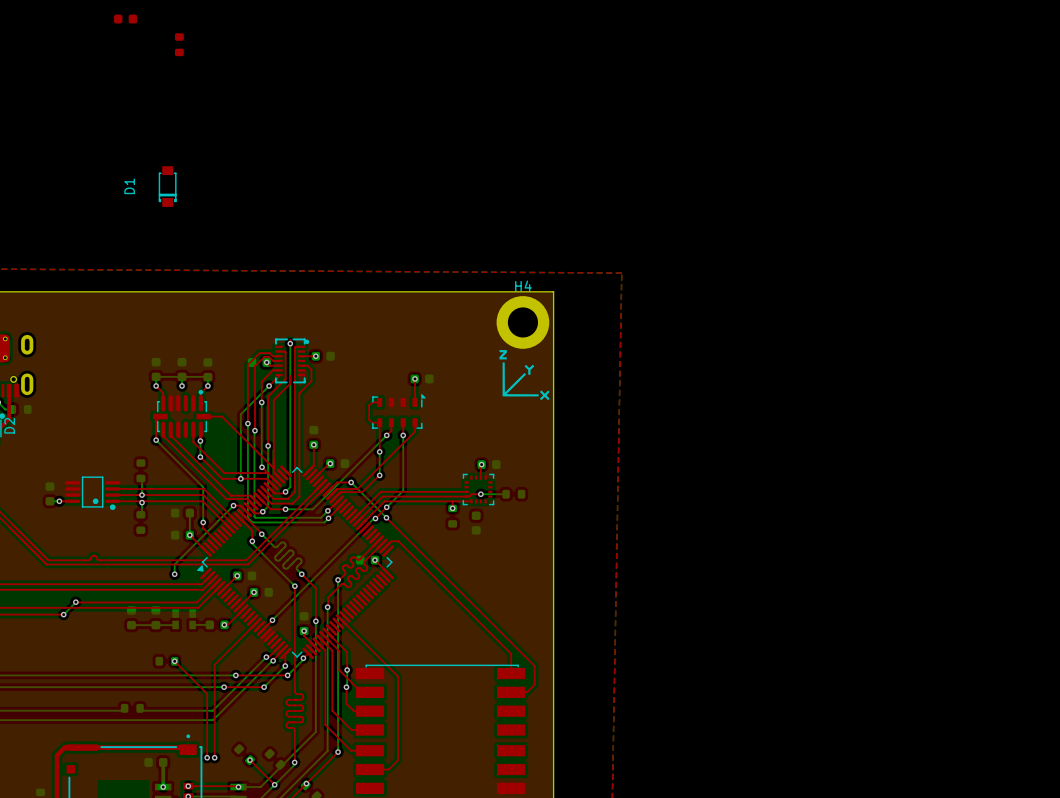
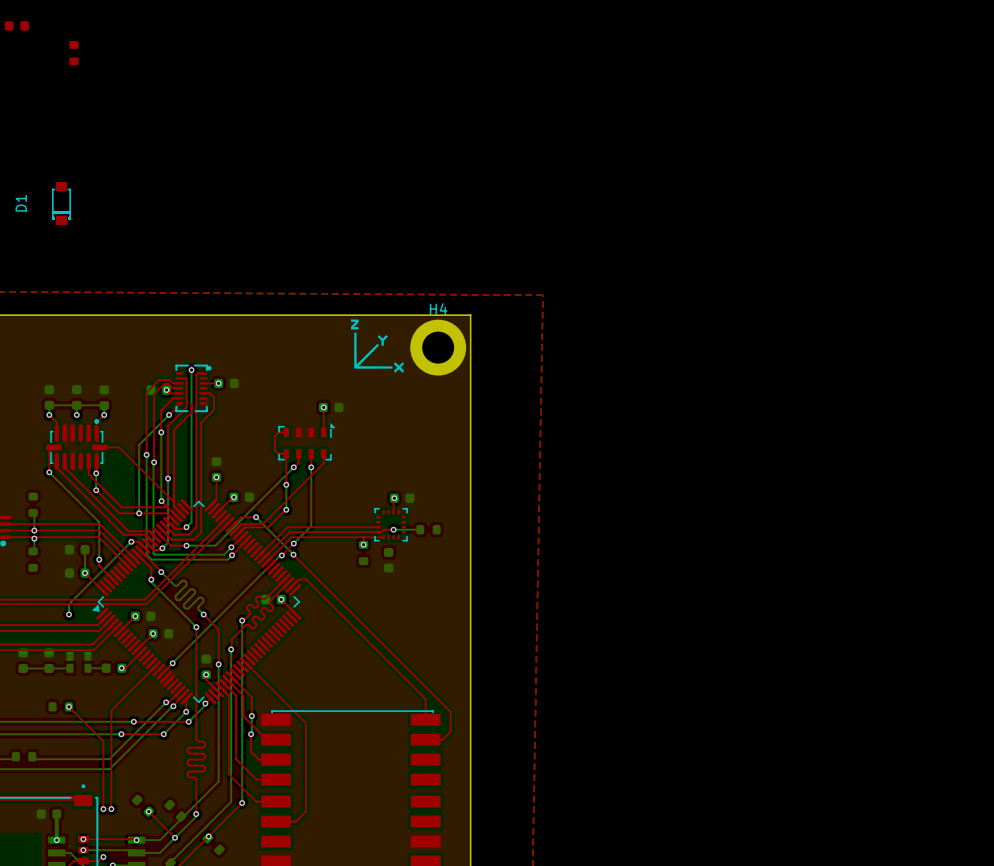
drawing position: (524, 375) -> (377, 346)

